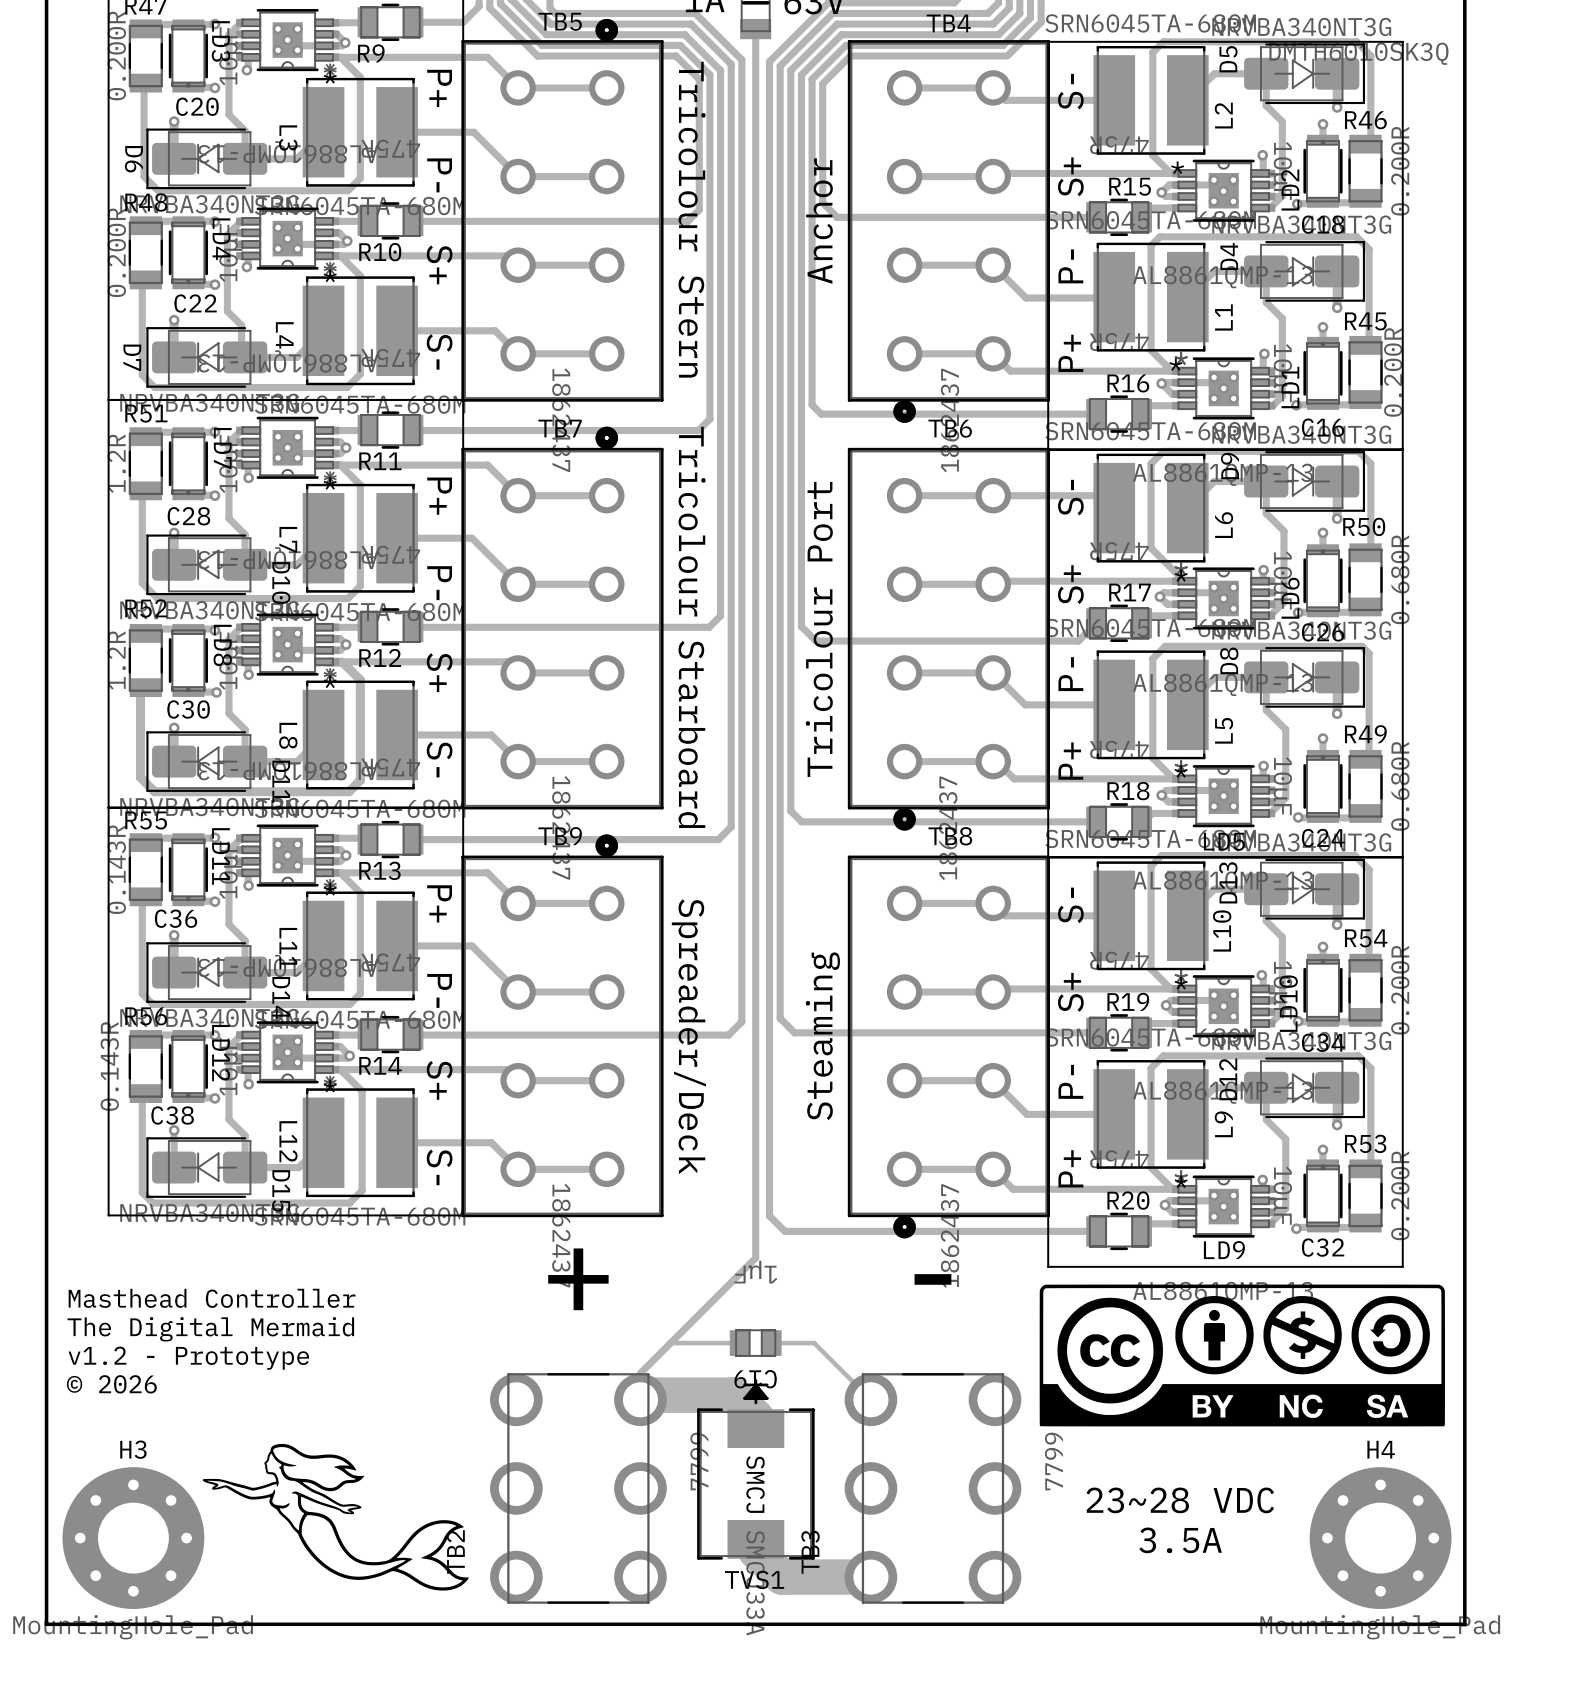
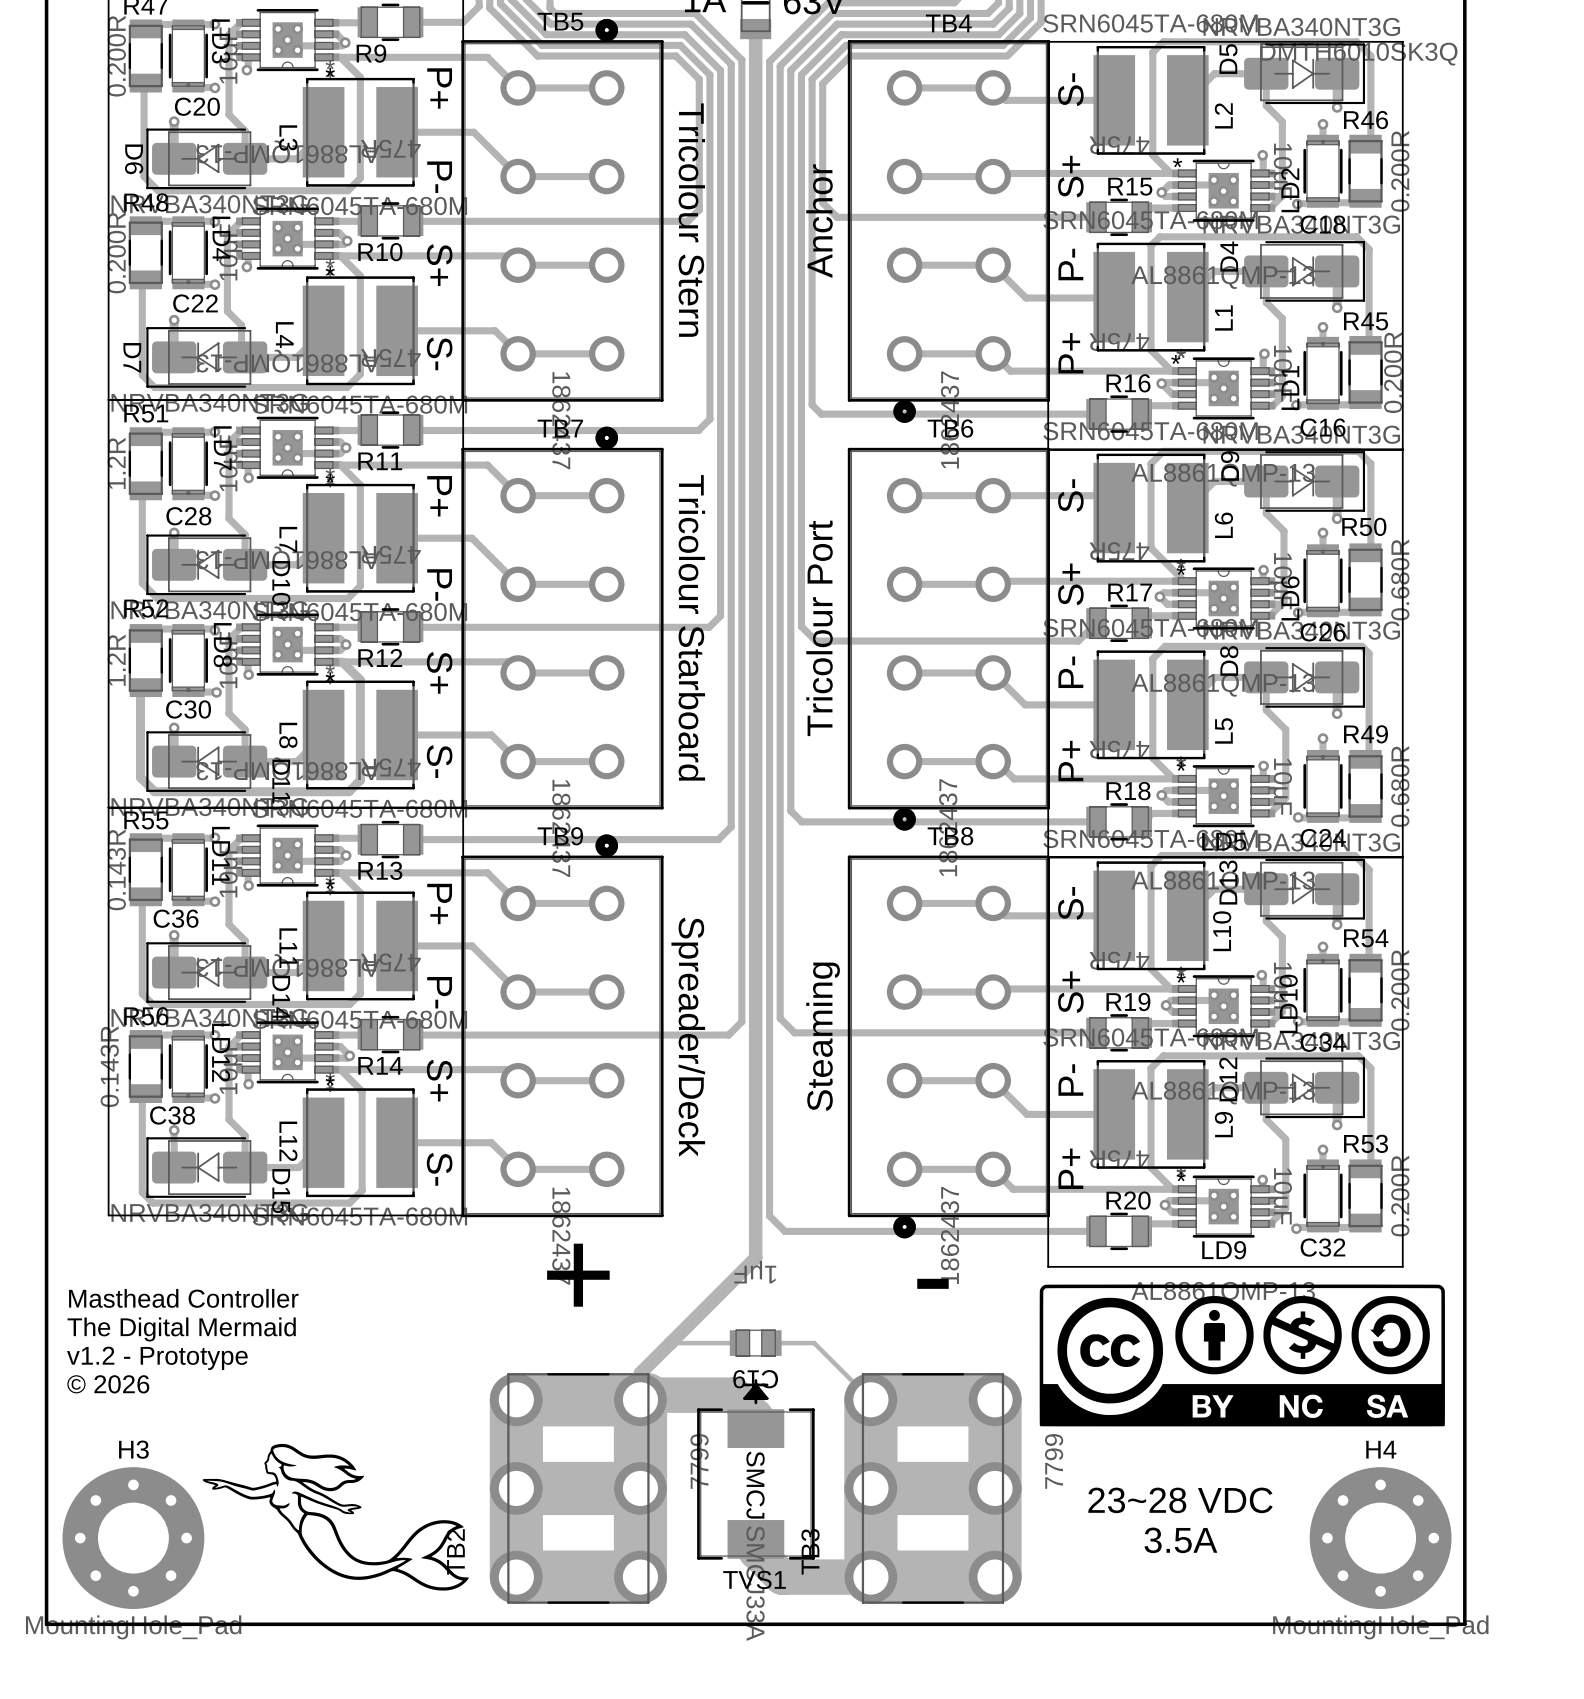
track width: thin (755, 29) (755, 1257) (640, 1373) (640, 1399) -> thick (755, 29) (755, 1257) (640, 1373) (640, 1399)
track: none -> (516, 1399) (640, 1399) (640, 1577) (516, 1577) (516, 1399)
track: none -> (870, 1399) (995, 1399) (995, 1577) (870, 1577) (870, 1399)
track: none -> (516, 1488) (640, 1488)
track: none -> (870, 1488) (995, 1488)

